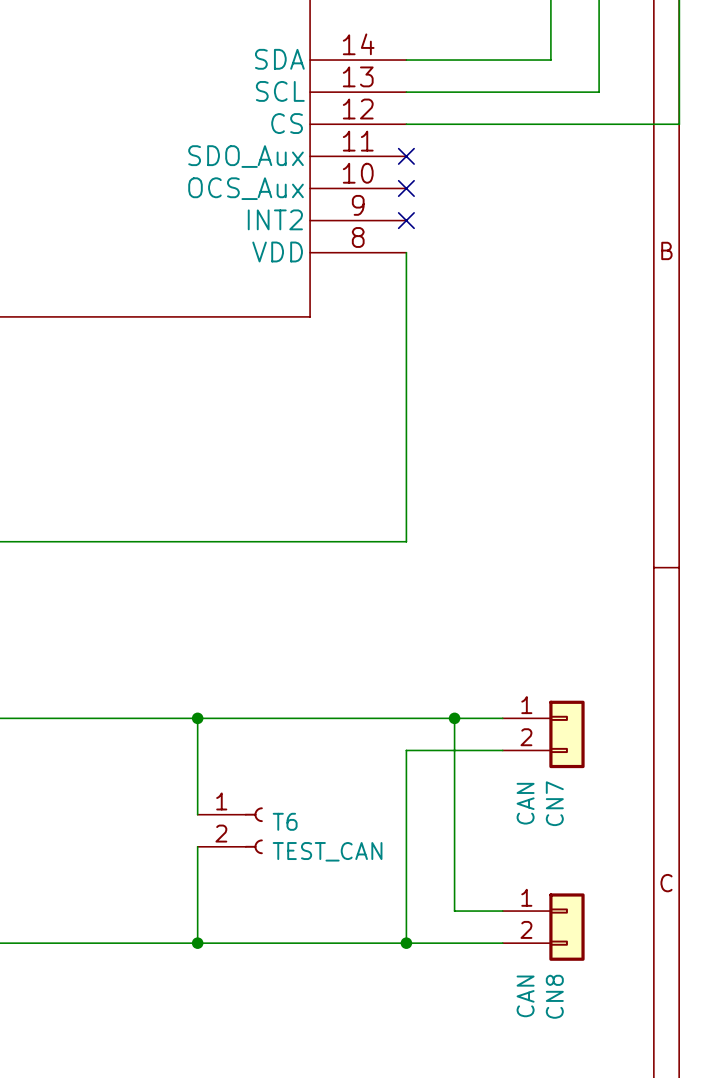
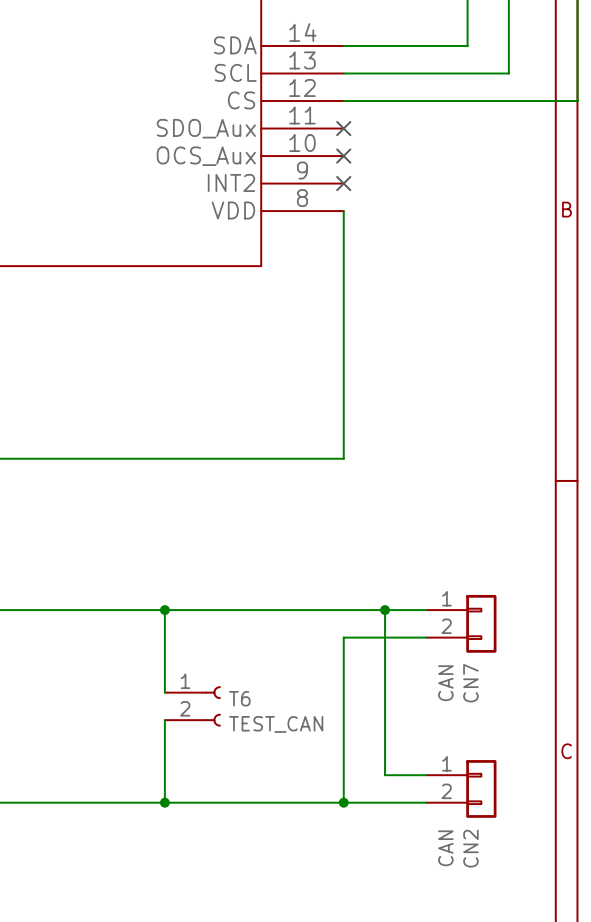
CN8 name: CN8 (554, 996) -> CN2 (470, 848)

